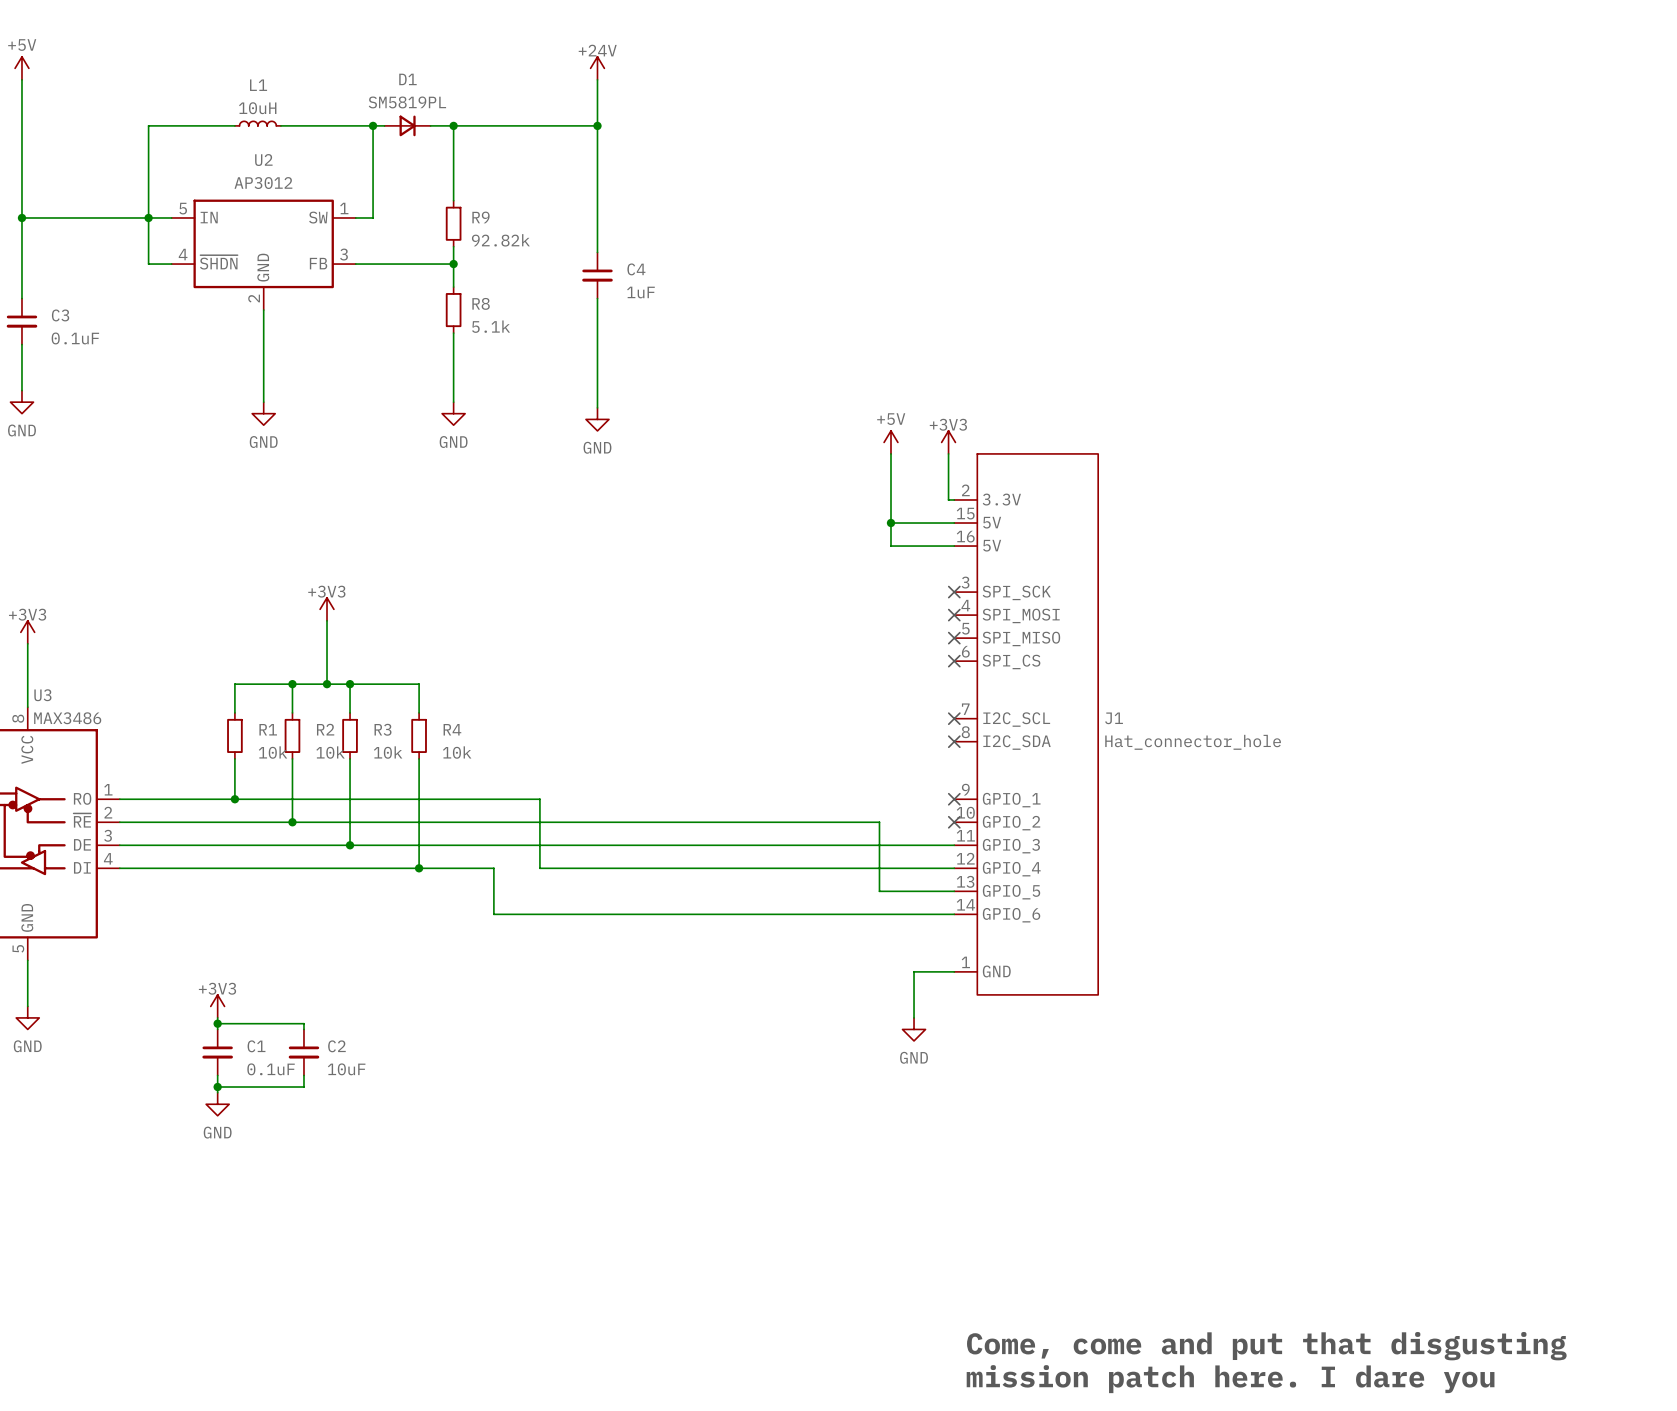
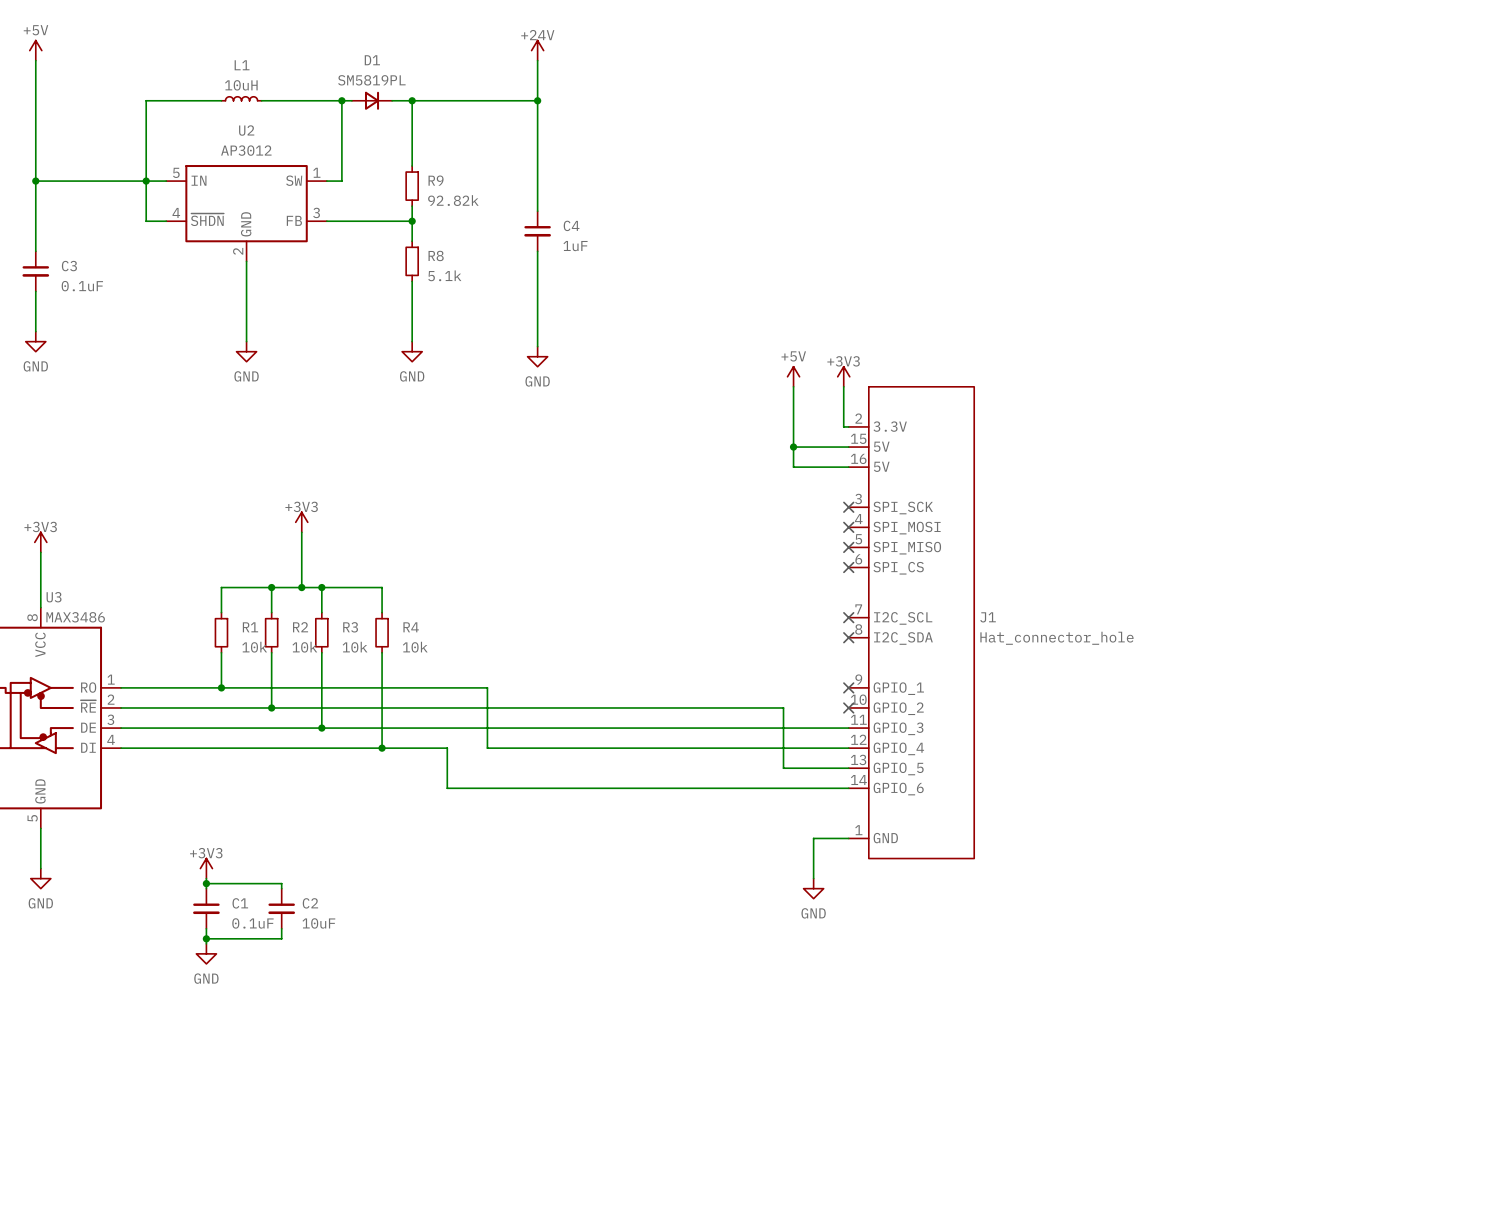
text: Come, come and put that disgusting (1266, 1346) -> none
text: mission patch here. I dare you (1230, 1379) -> none

